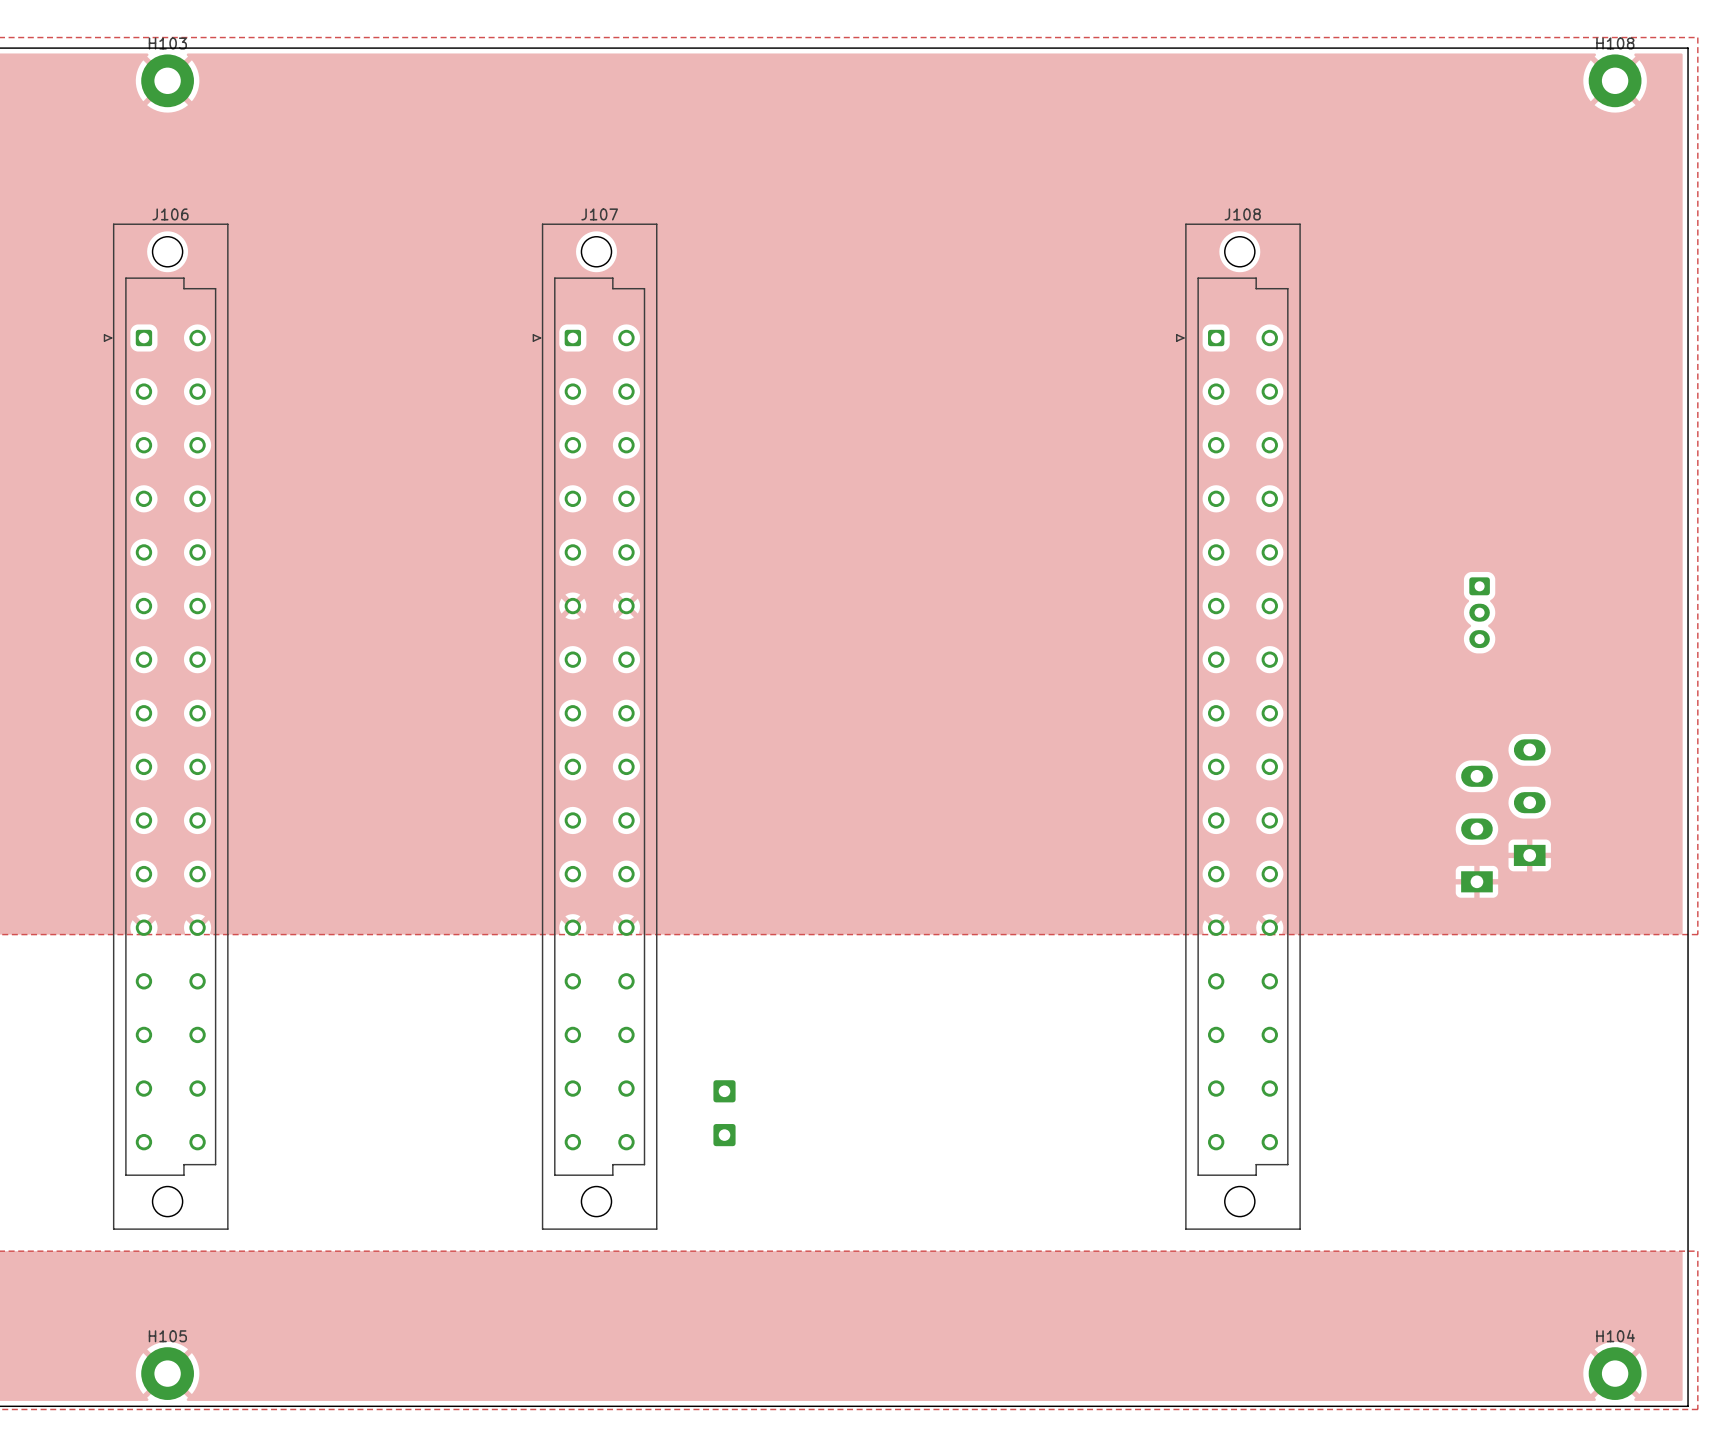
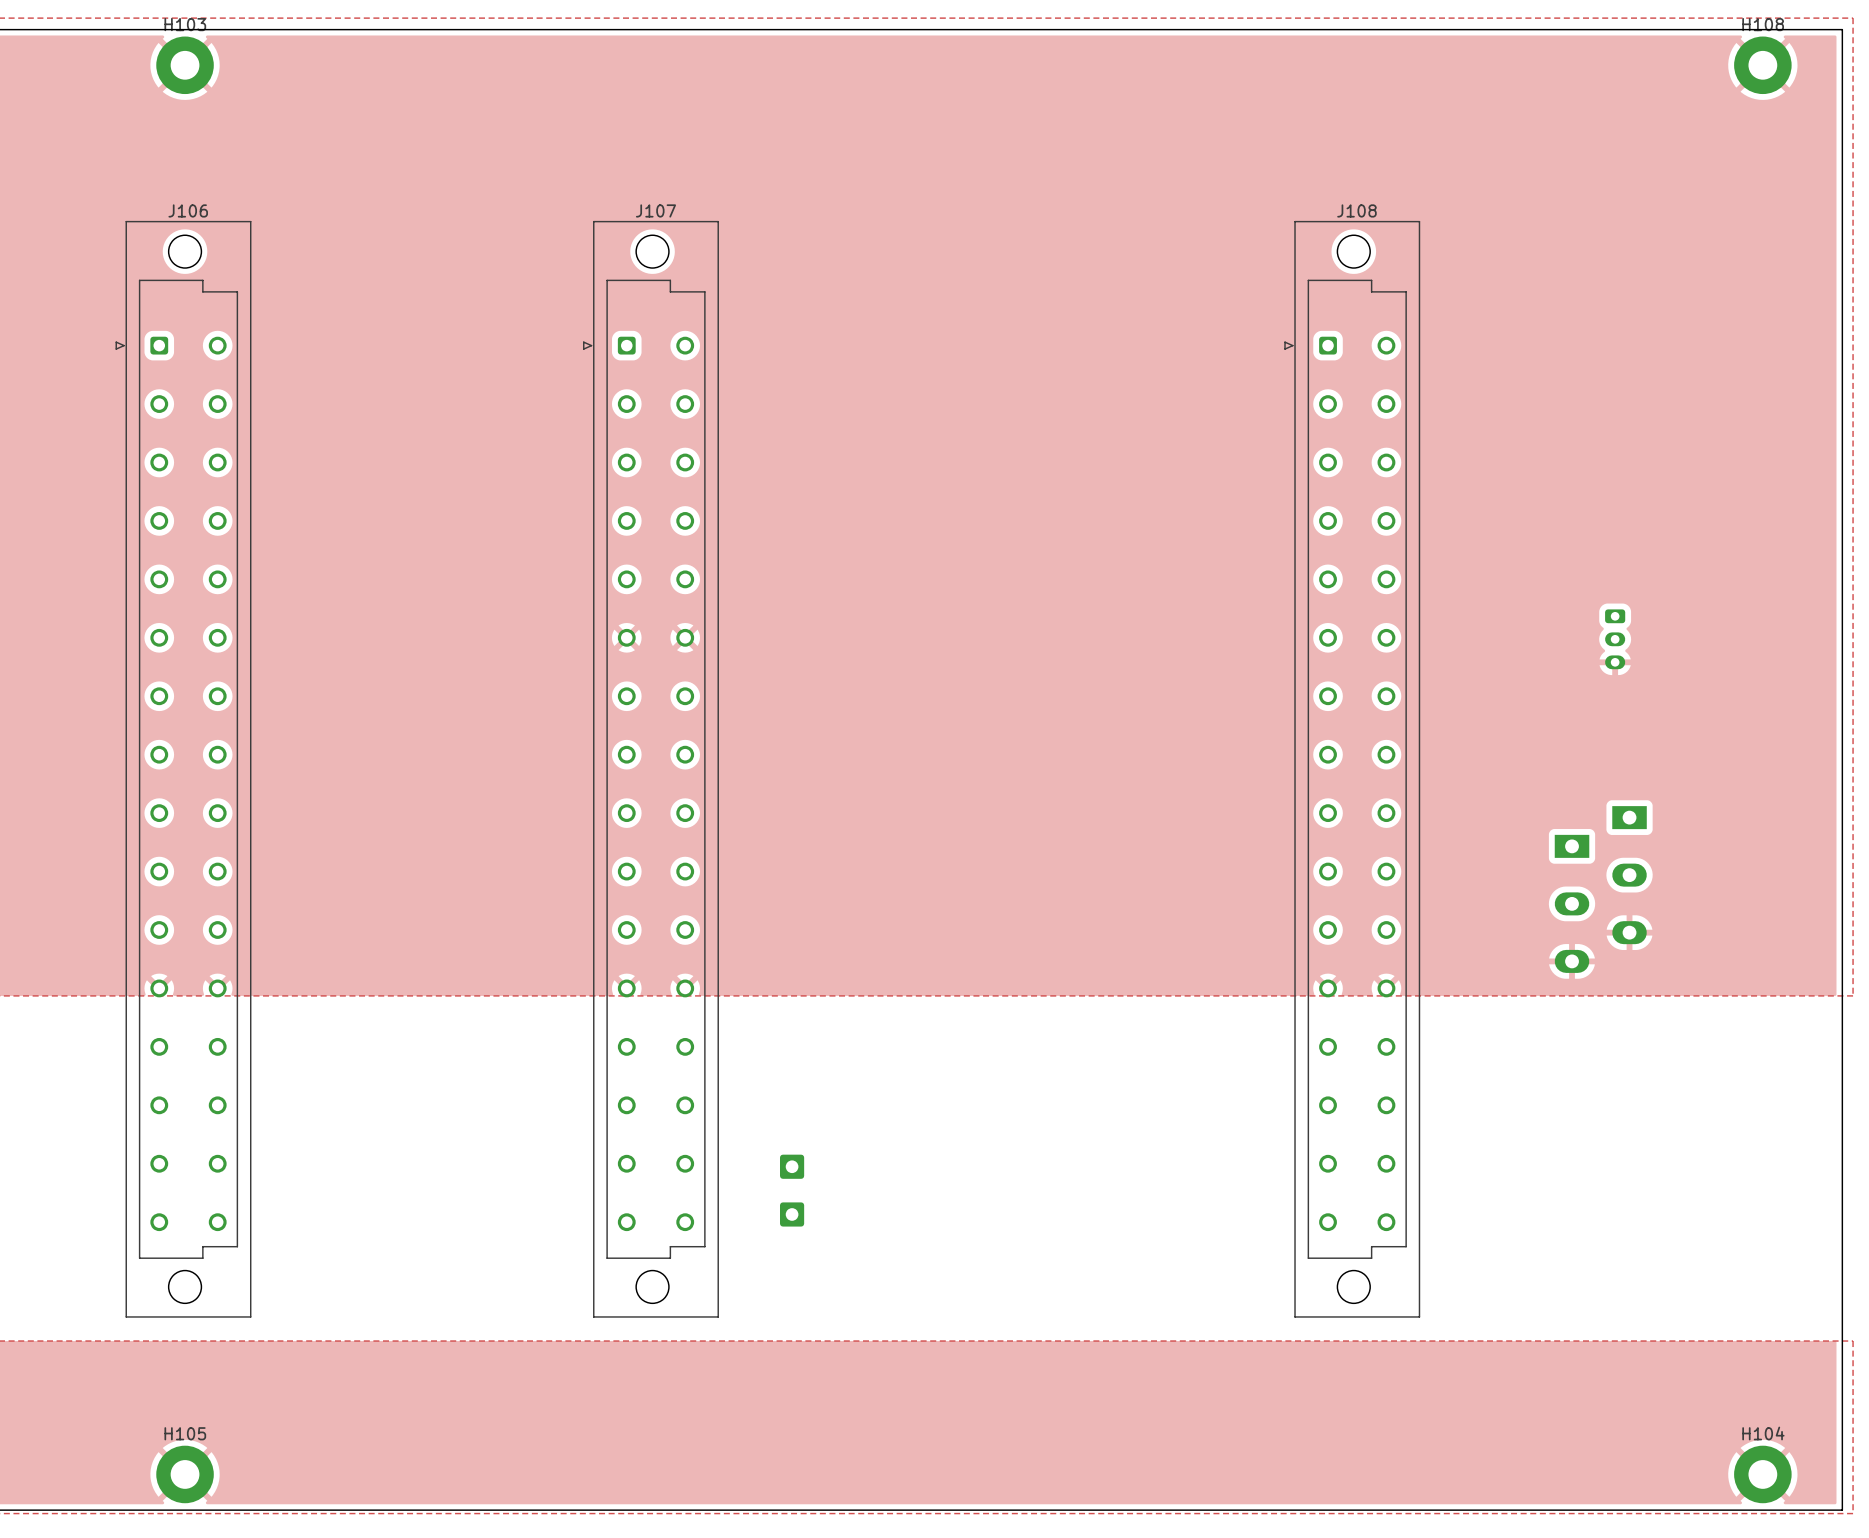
part footprint: [1469, 577, 1490, 649] -> [1605, 609, 1626, 670]
part rotation: 0° (1503, 815) -> 180° (1600, 889)

